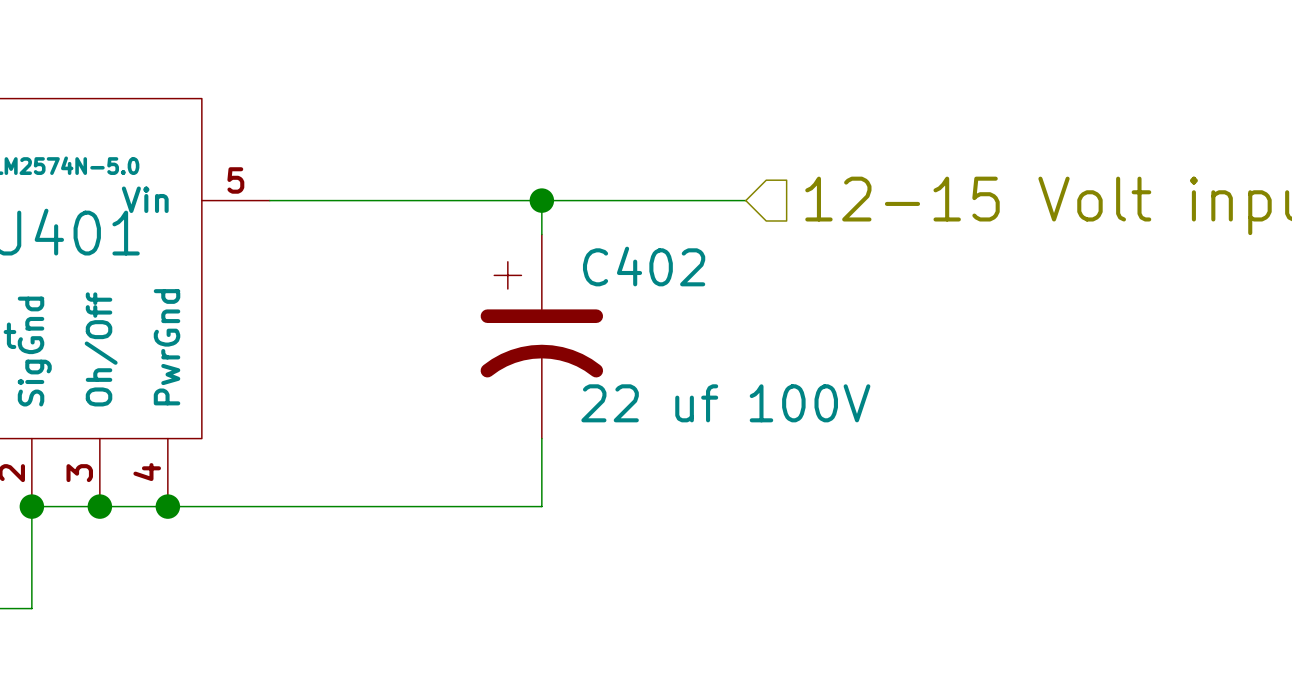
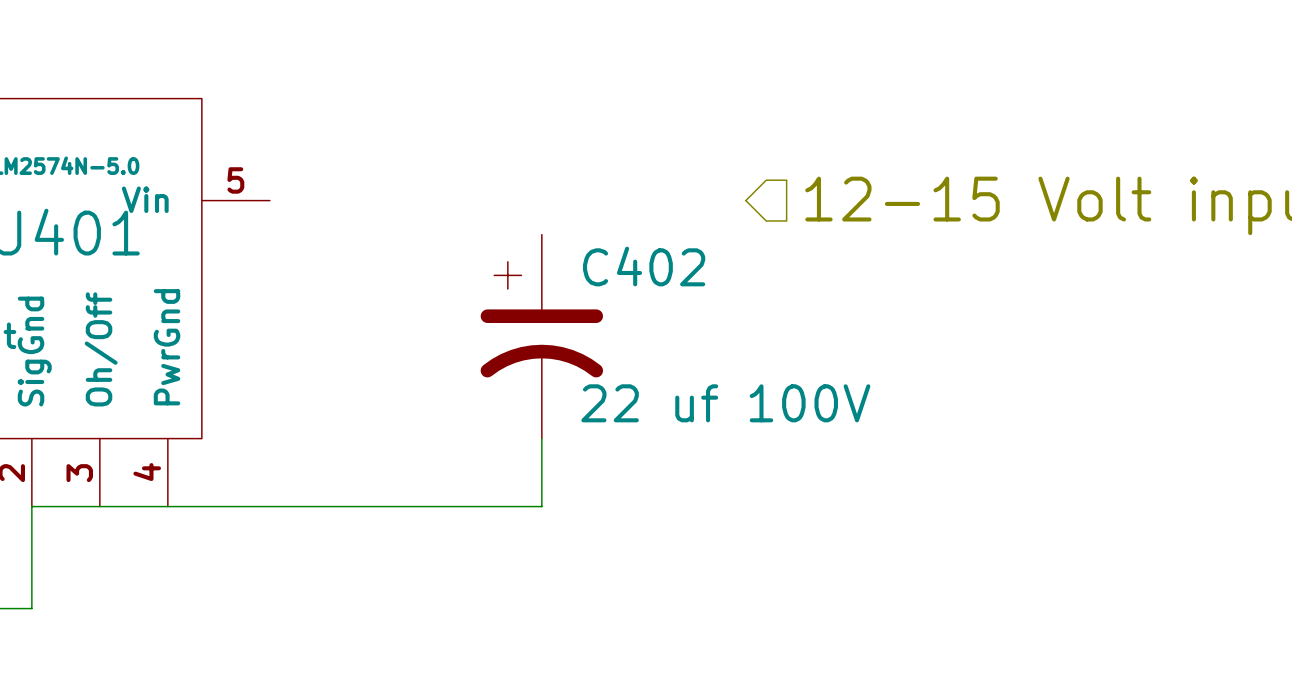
wire: (269, 200) (745, 200) -> none
wire: (541, 200) (541, 234) -> none
junction: (541, 200) -> none
junction: (31, 506) -> none
junction: (99, 506) -> none
junction: (167, 506) -> none

